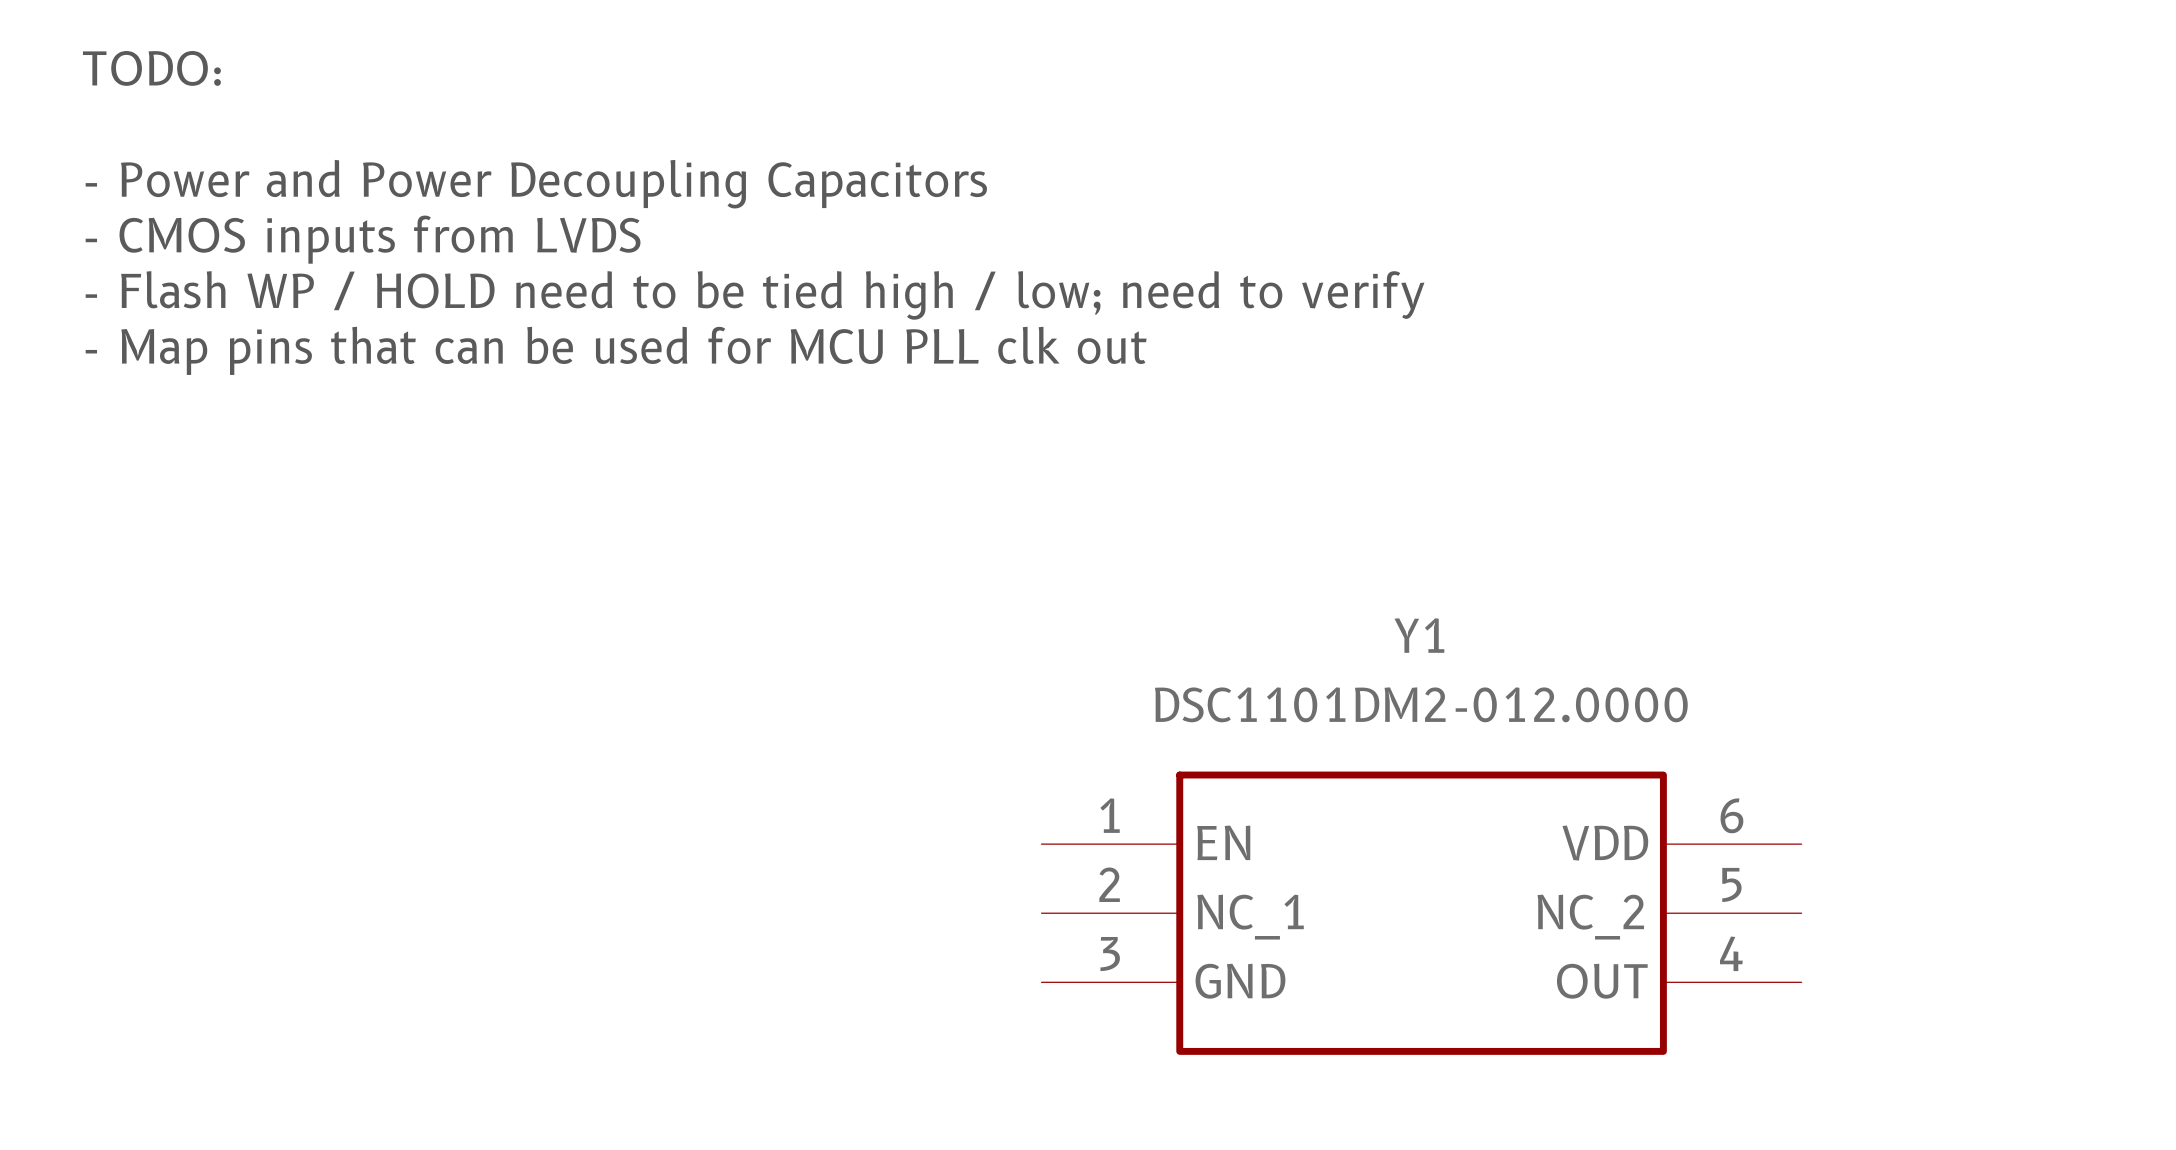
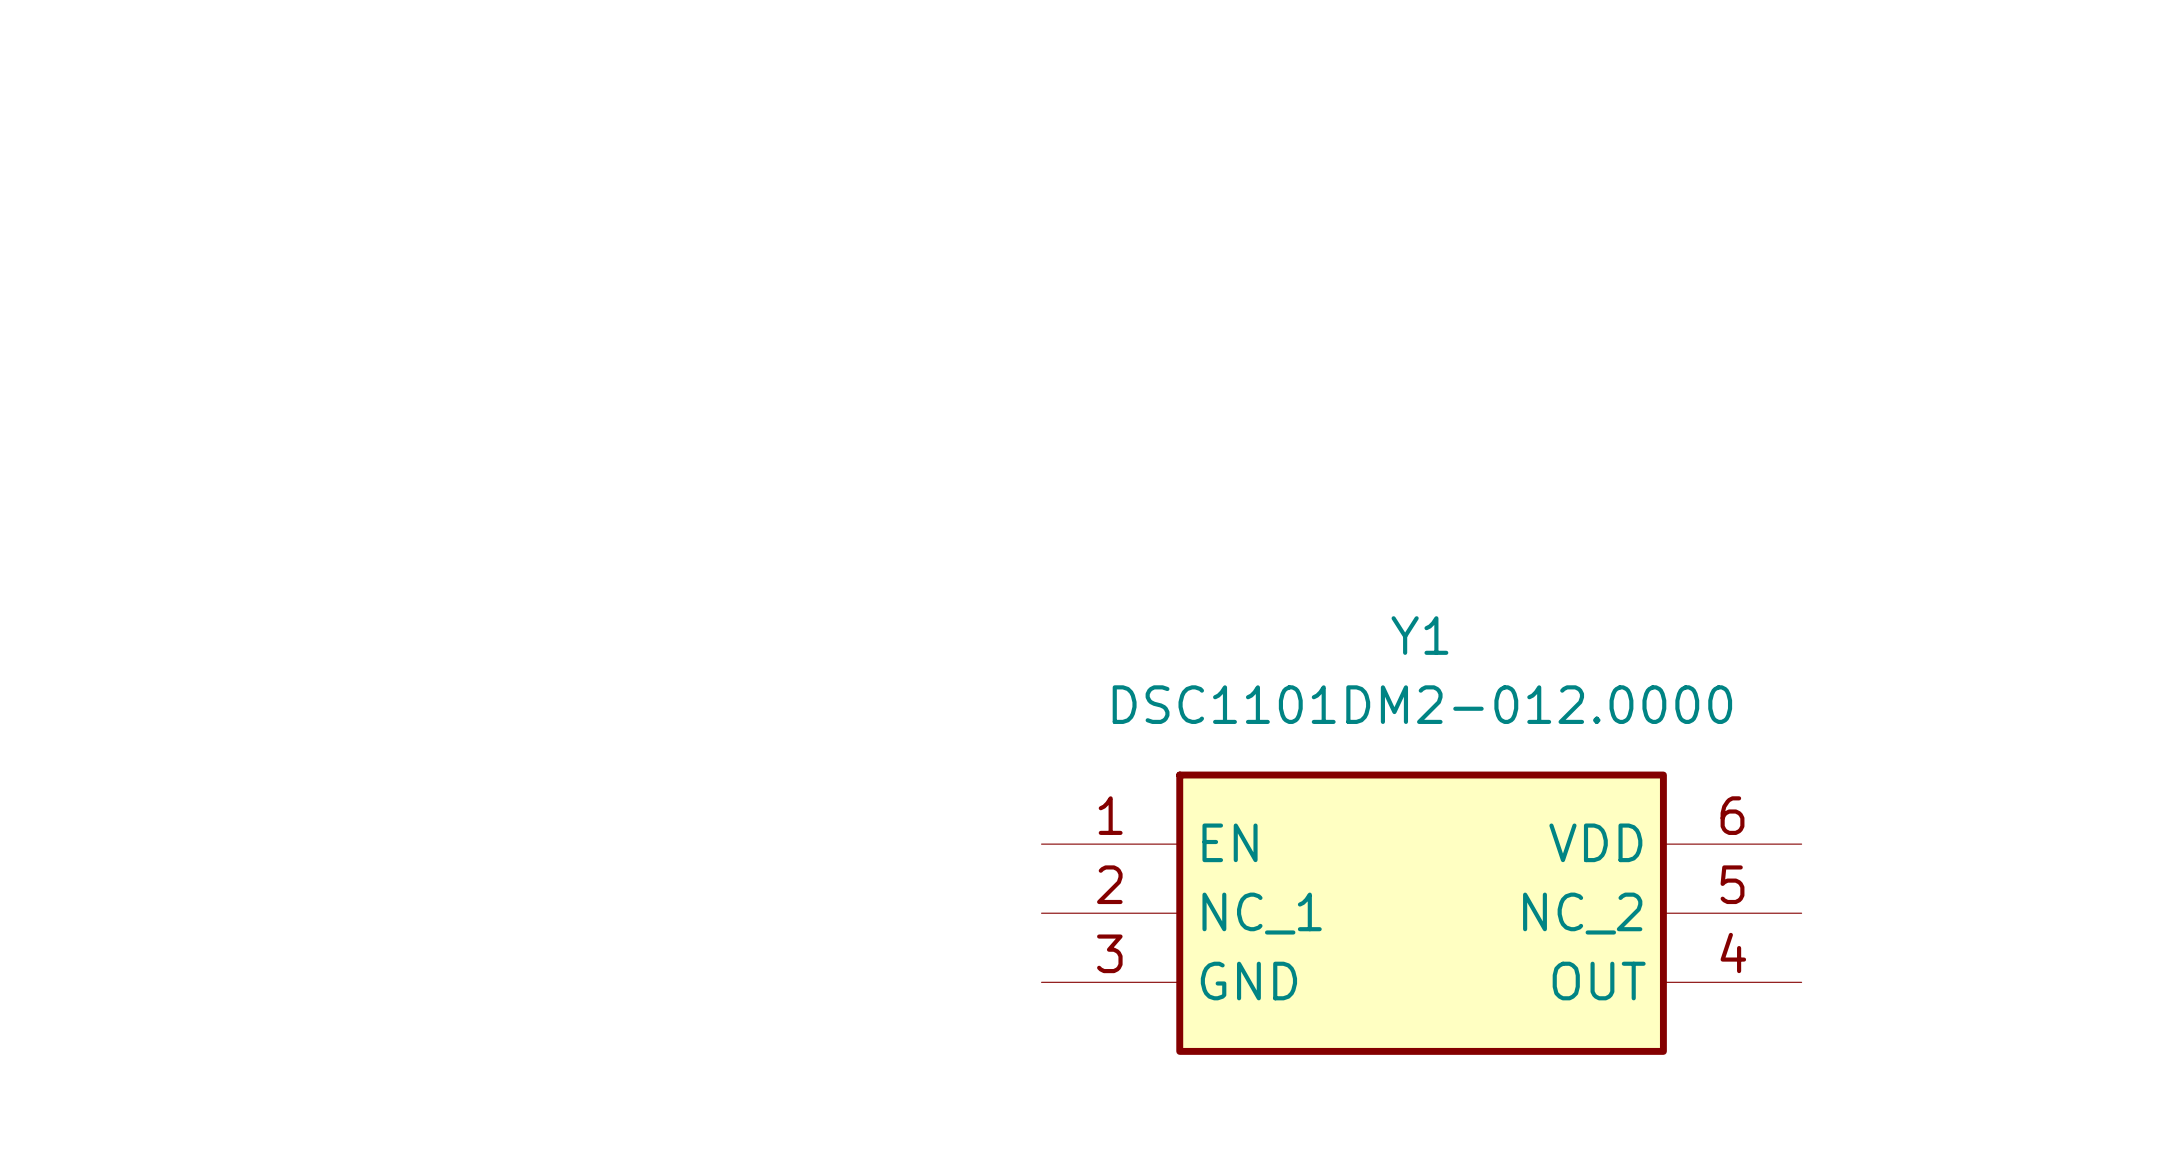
text: TODO: (151, 68) -> none
text: - Power and Power Decoupling Capacitors (536, 184) -> none
text: - CMOS inputs from LVDS (363, 239) -> none
text: - Flash WP / HOLD need to be tied high / low; need to verify (755, 295) -> none
text: - Map pins that can be used for MCU PLL clk out (616, 350) -> none

